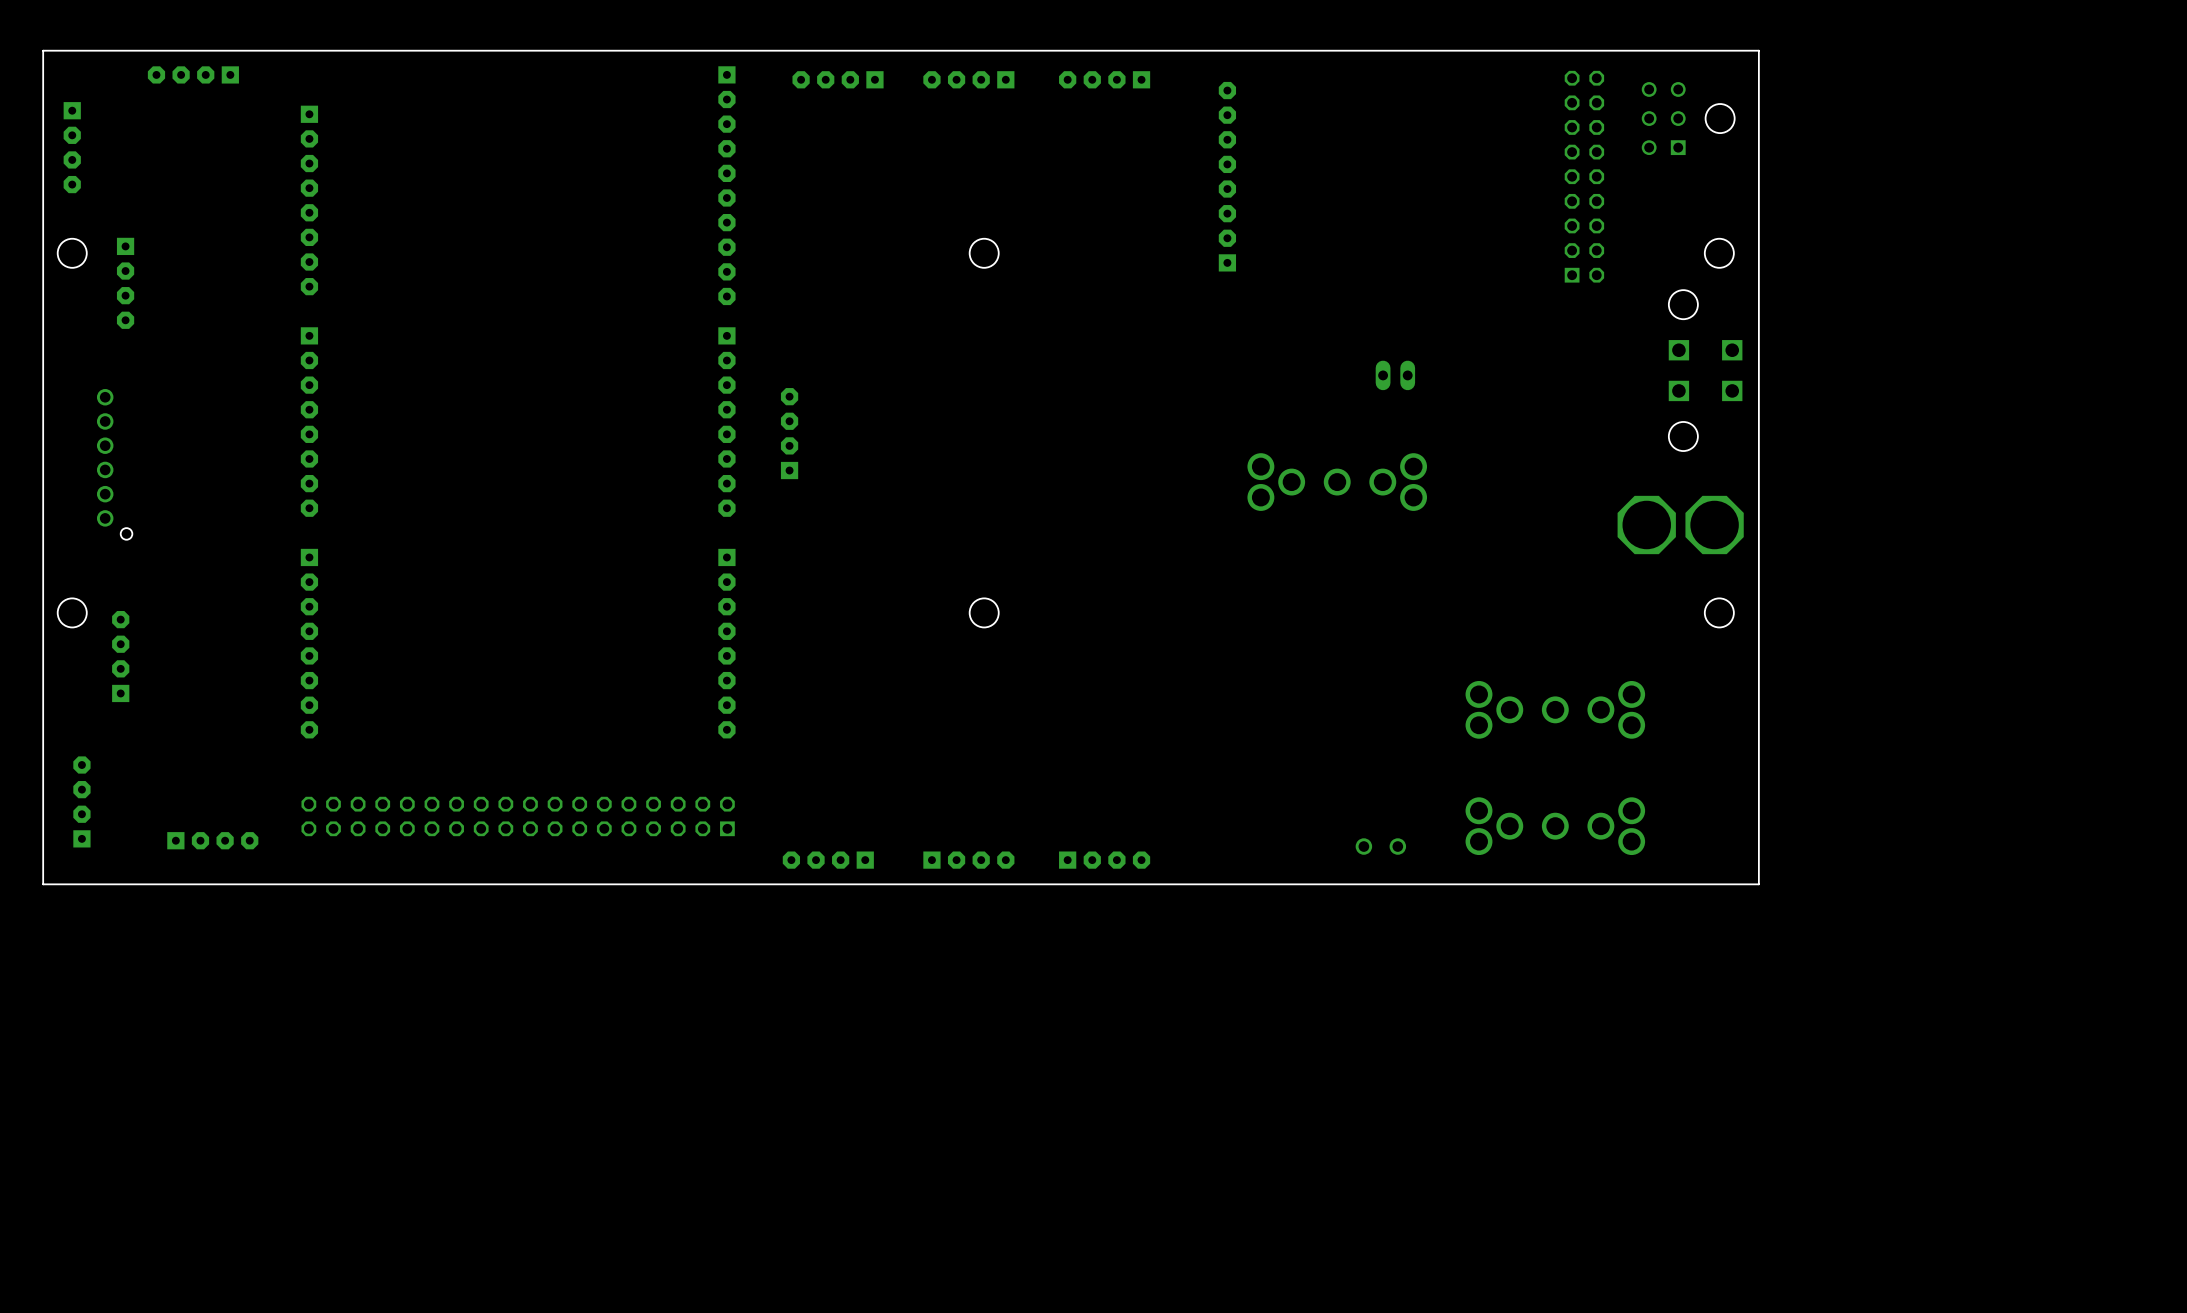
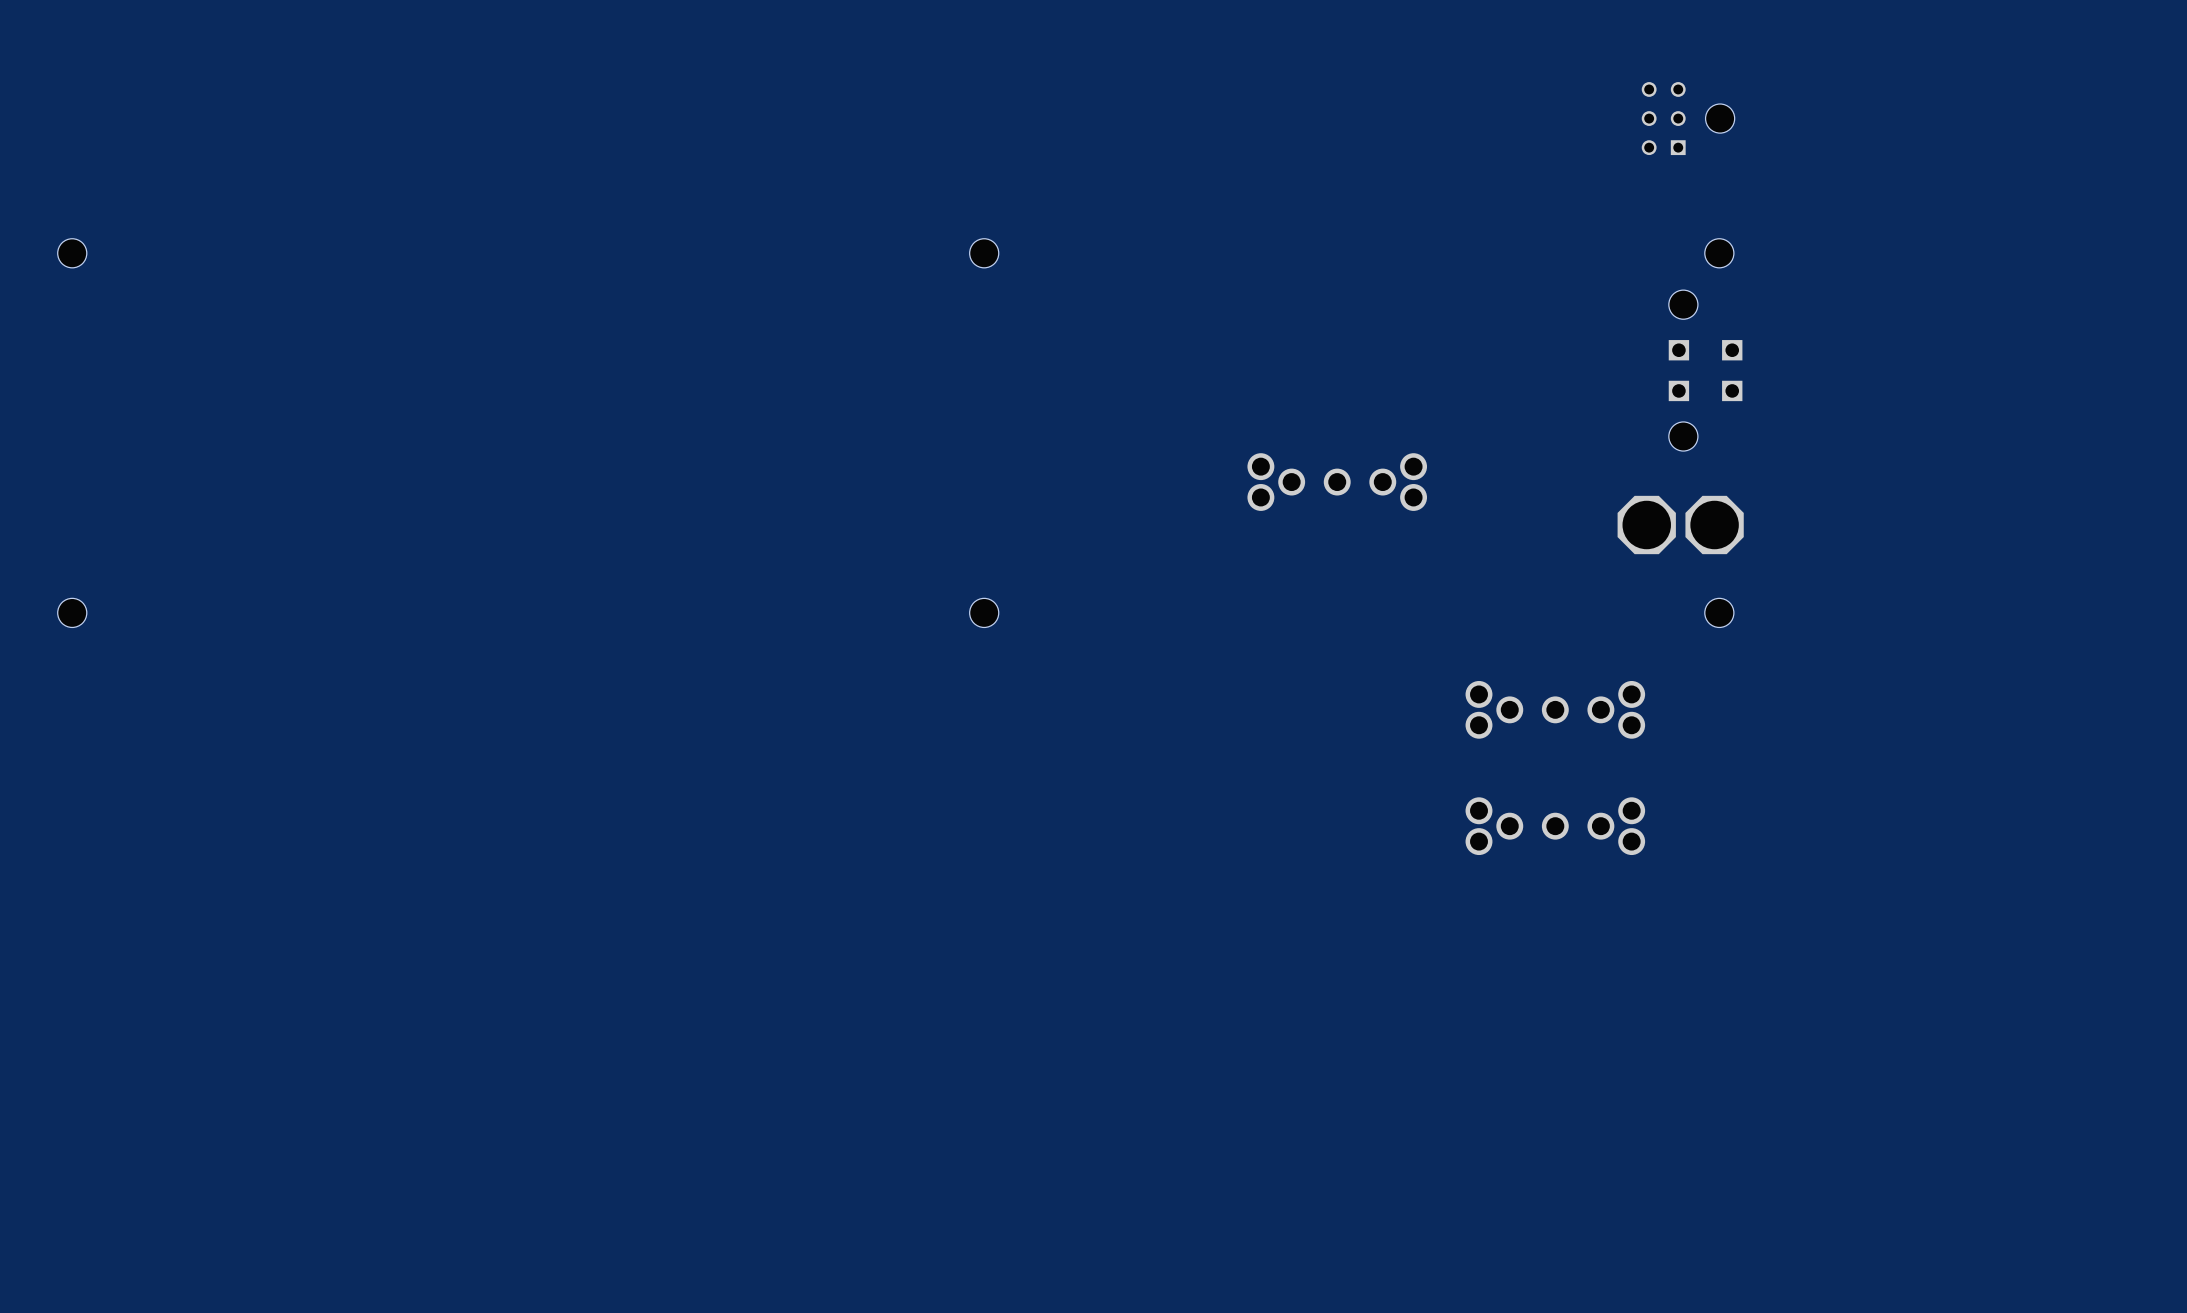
board edge: (1758, 50) (43, 50) (43, 884) (1758, 884) (1758, 50) -> none
part: (193, 74) -> none
part: (838, 79) -> none
part: (968, 79) -> none
part: (1104, 79) -> none
part: (72, 147) -> none
part: (1227, 176) -> none
part: (1584, 176) -> none
part: (726, 185) -> none
part: (309, 200) -> none
part: (125, 283) -> none
part: (1395, 375) -> none
part: (309, 422) -> none
part: (726, 422) -> none
part: (789, 433) -> none
part: (114, 464) -> none
part: (309, 643) -> none
part: (726, 643) -> none
part: (120, 656) -> none
part: (81, 801) -> none
part: (518, 816) -> none
part: (212, 840) -> none
part: (1380, 846) -> none
part: (828, 860) -> none
part: (968, 860) -> none
part: (1104, 860) -> none

